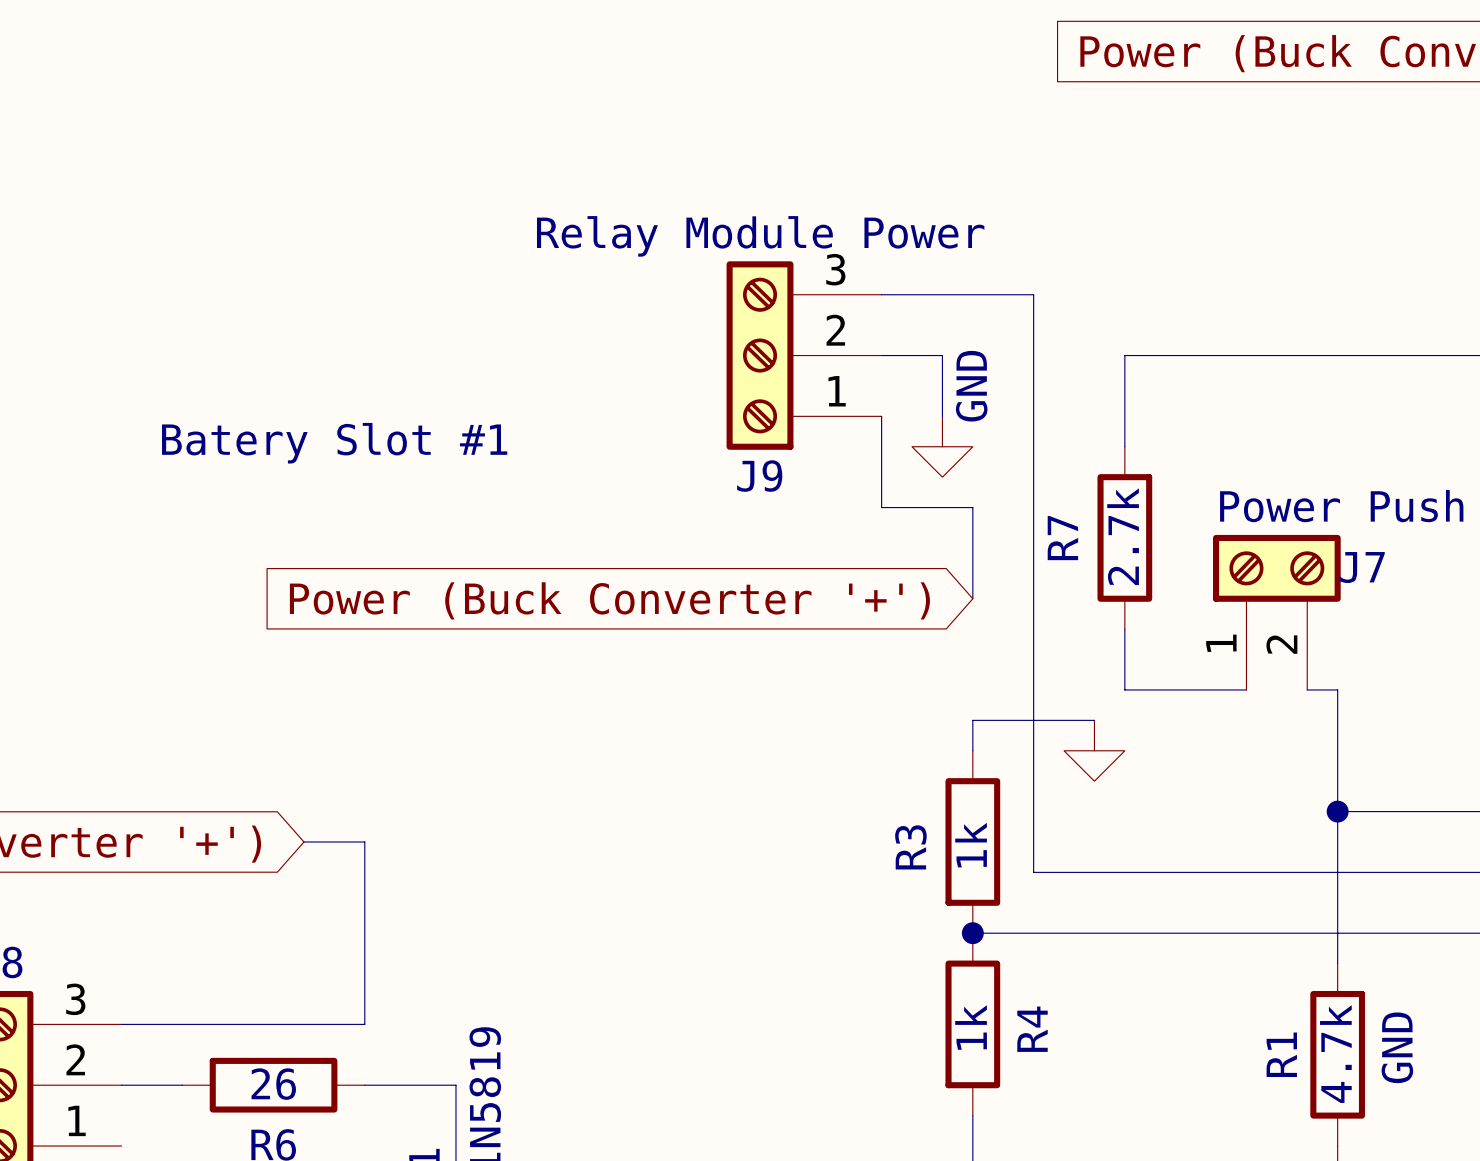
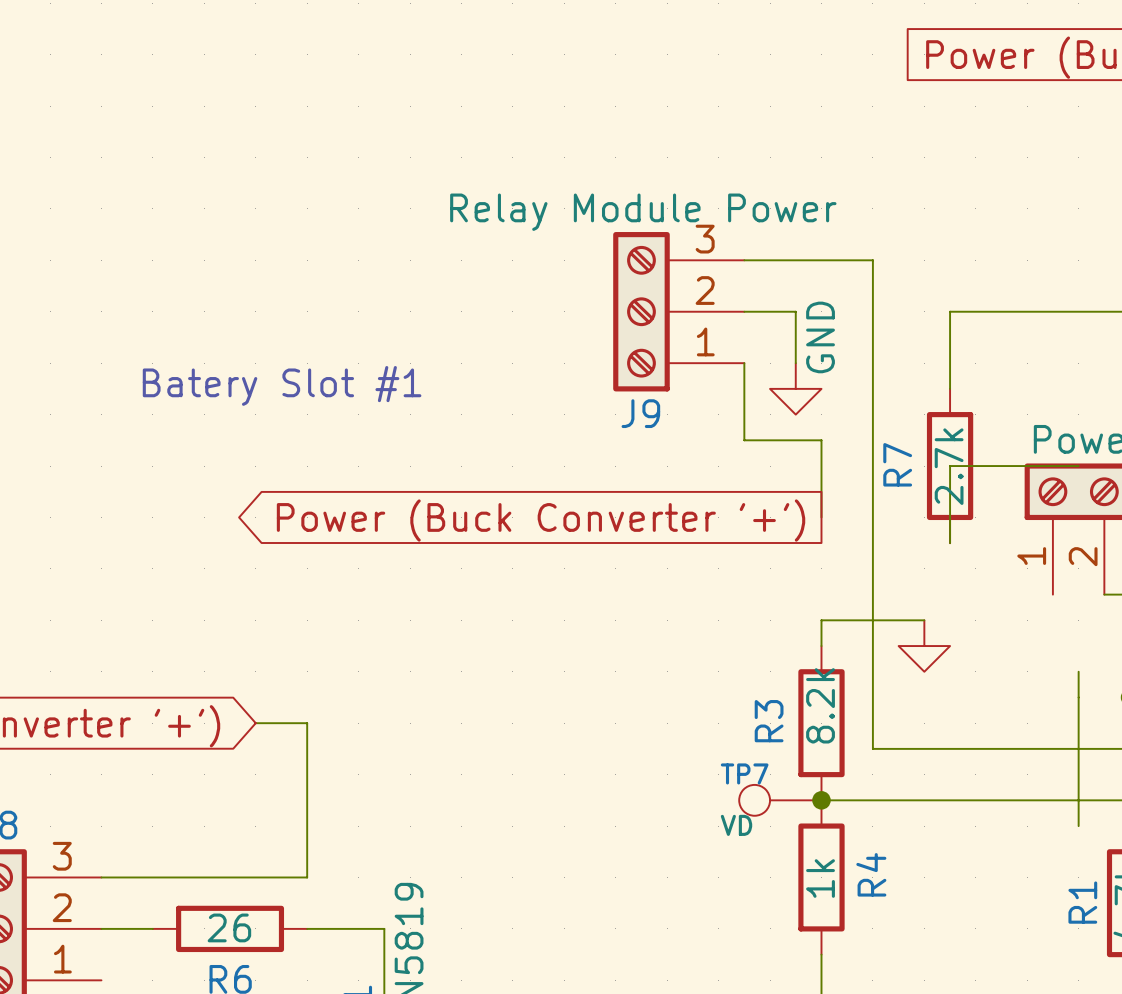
global label shape: input (609, 600) -> output (541, 520)
wire: (1124, 629) (1124, 689) (1246, 689) -> (950, 543) (950, 466) (1078, 466)
wire: none -> (1078, 671) (1078, 826)
R3 value: 1k (971, 845) -> 8.2k (820, 705)
TP7: none -> VD (780, 800)

